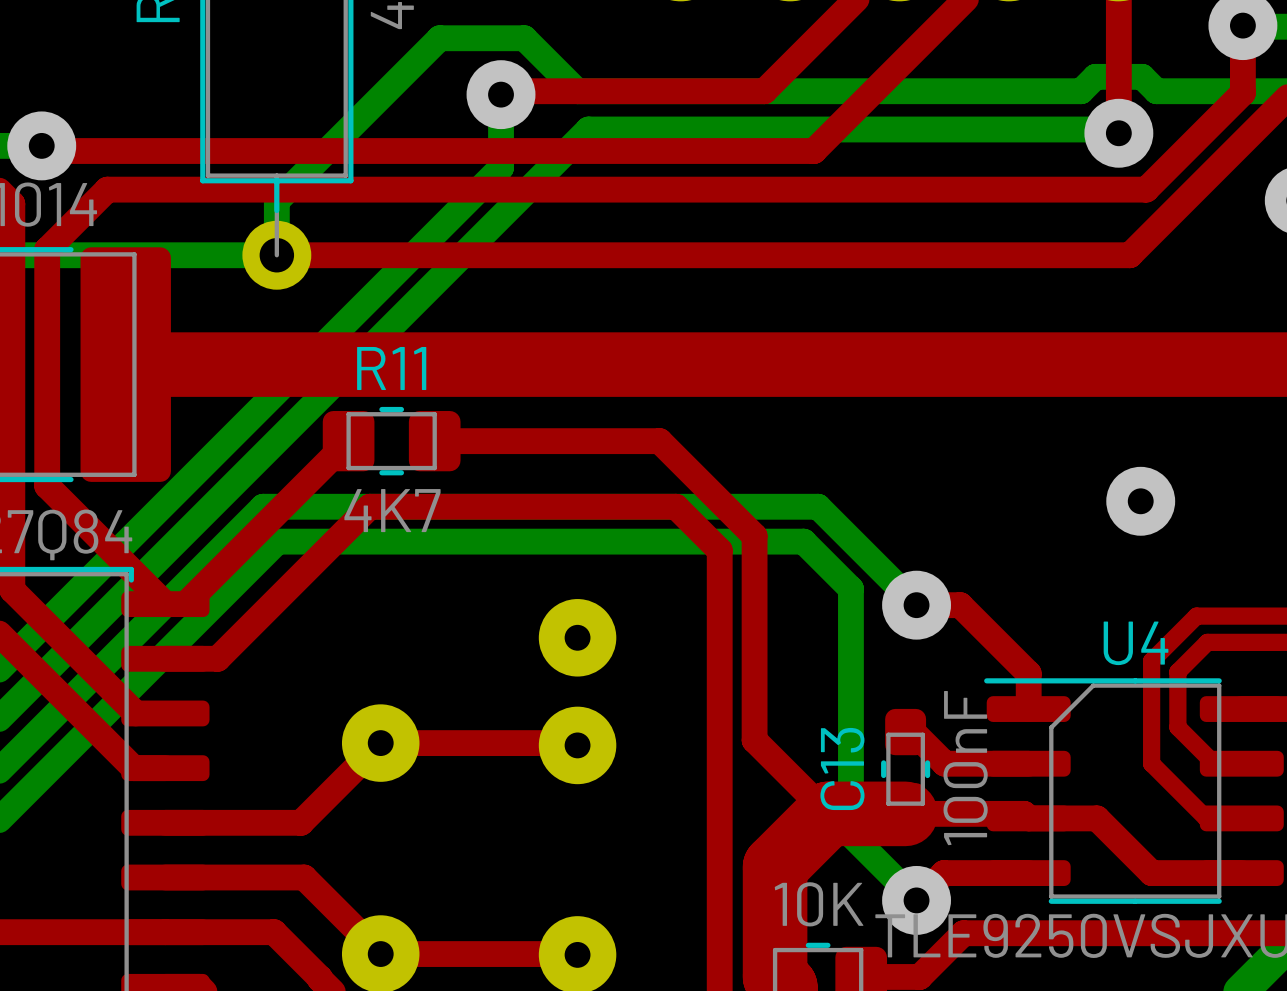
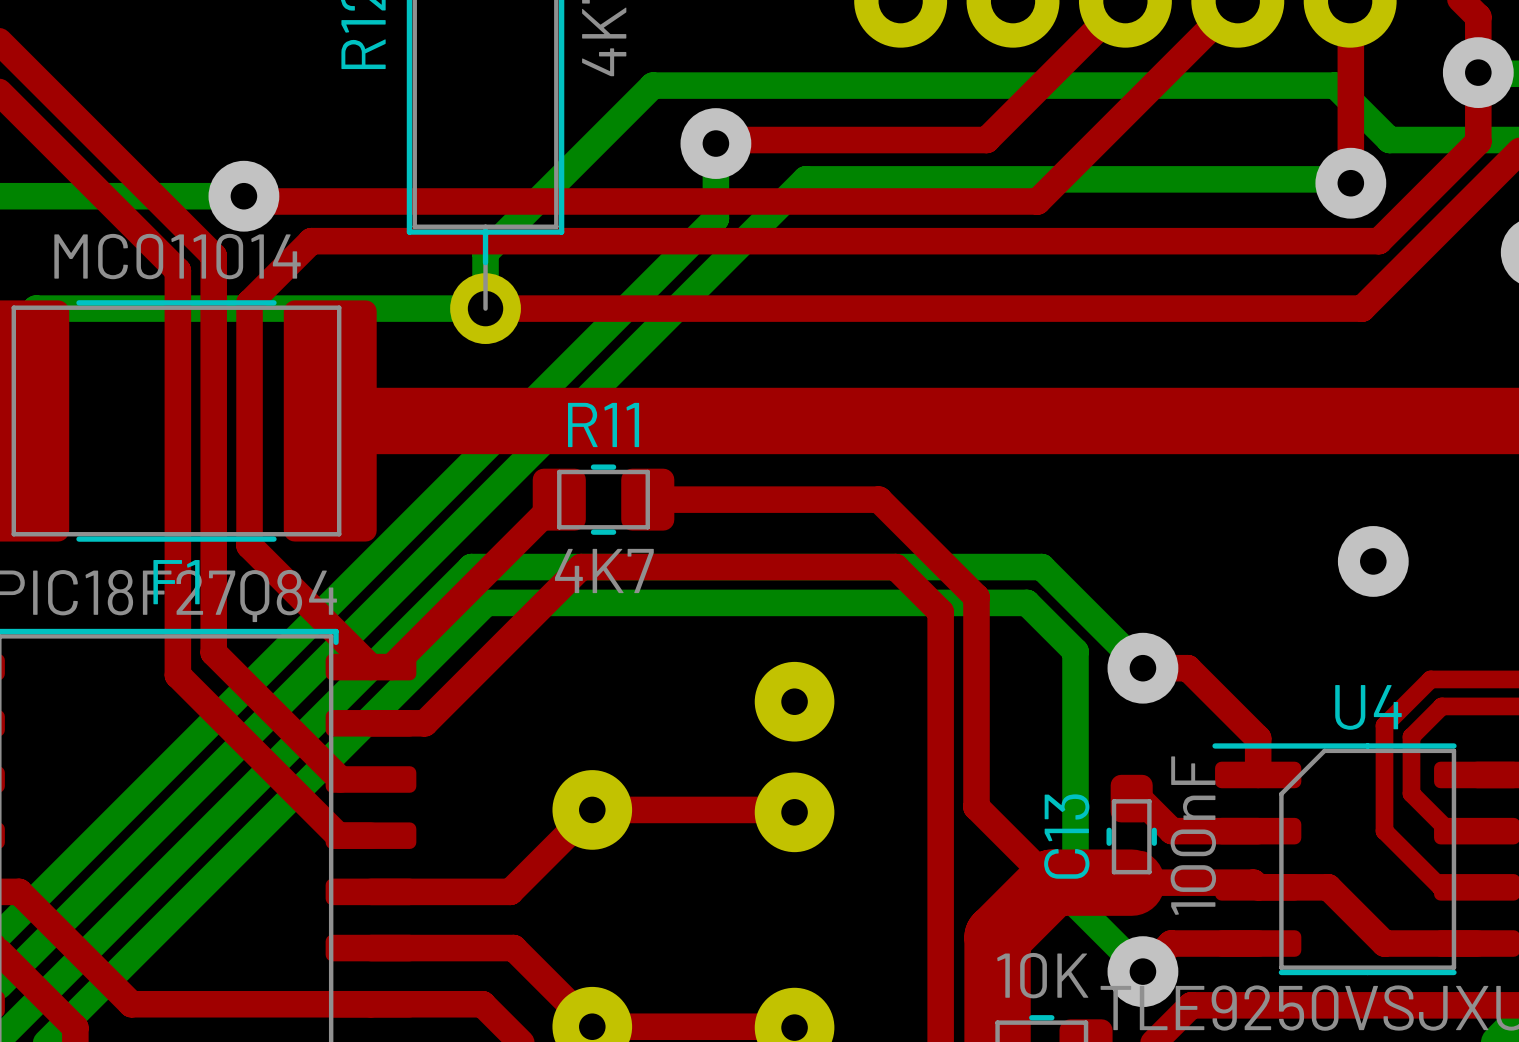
bottom track: (524, 38) (577, 91) (1081, 91) (1095, 76) (1142, 76) -> (739, 85) (1335, 85) (1374, 125)

